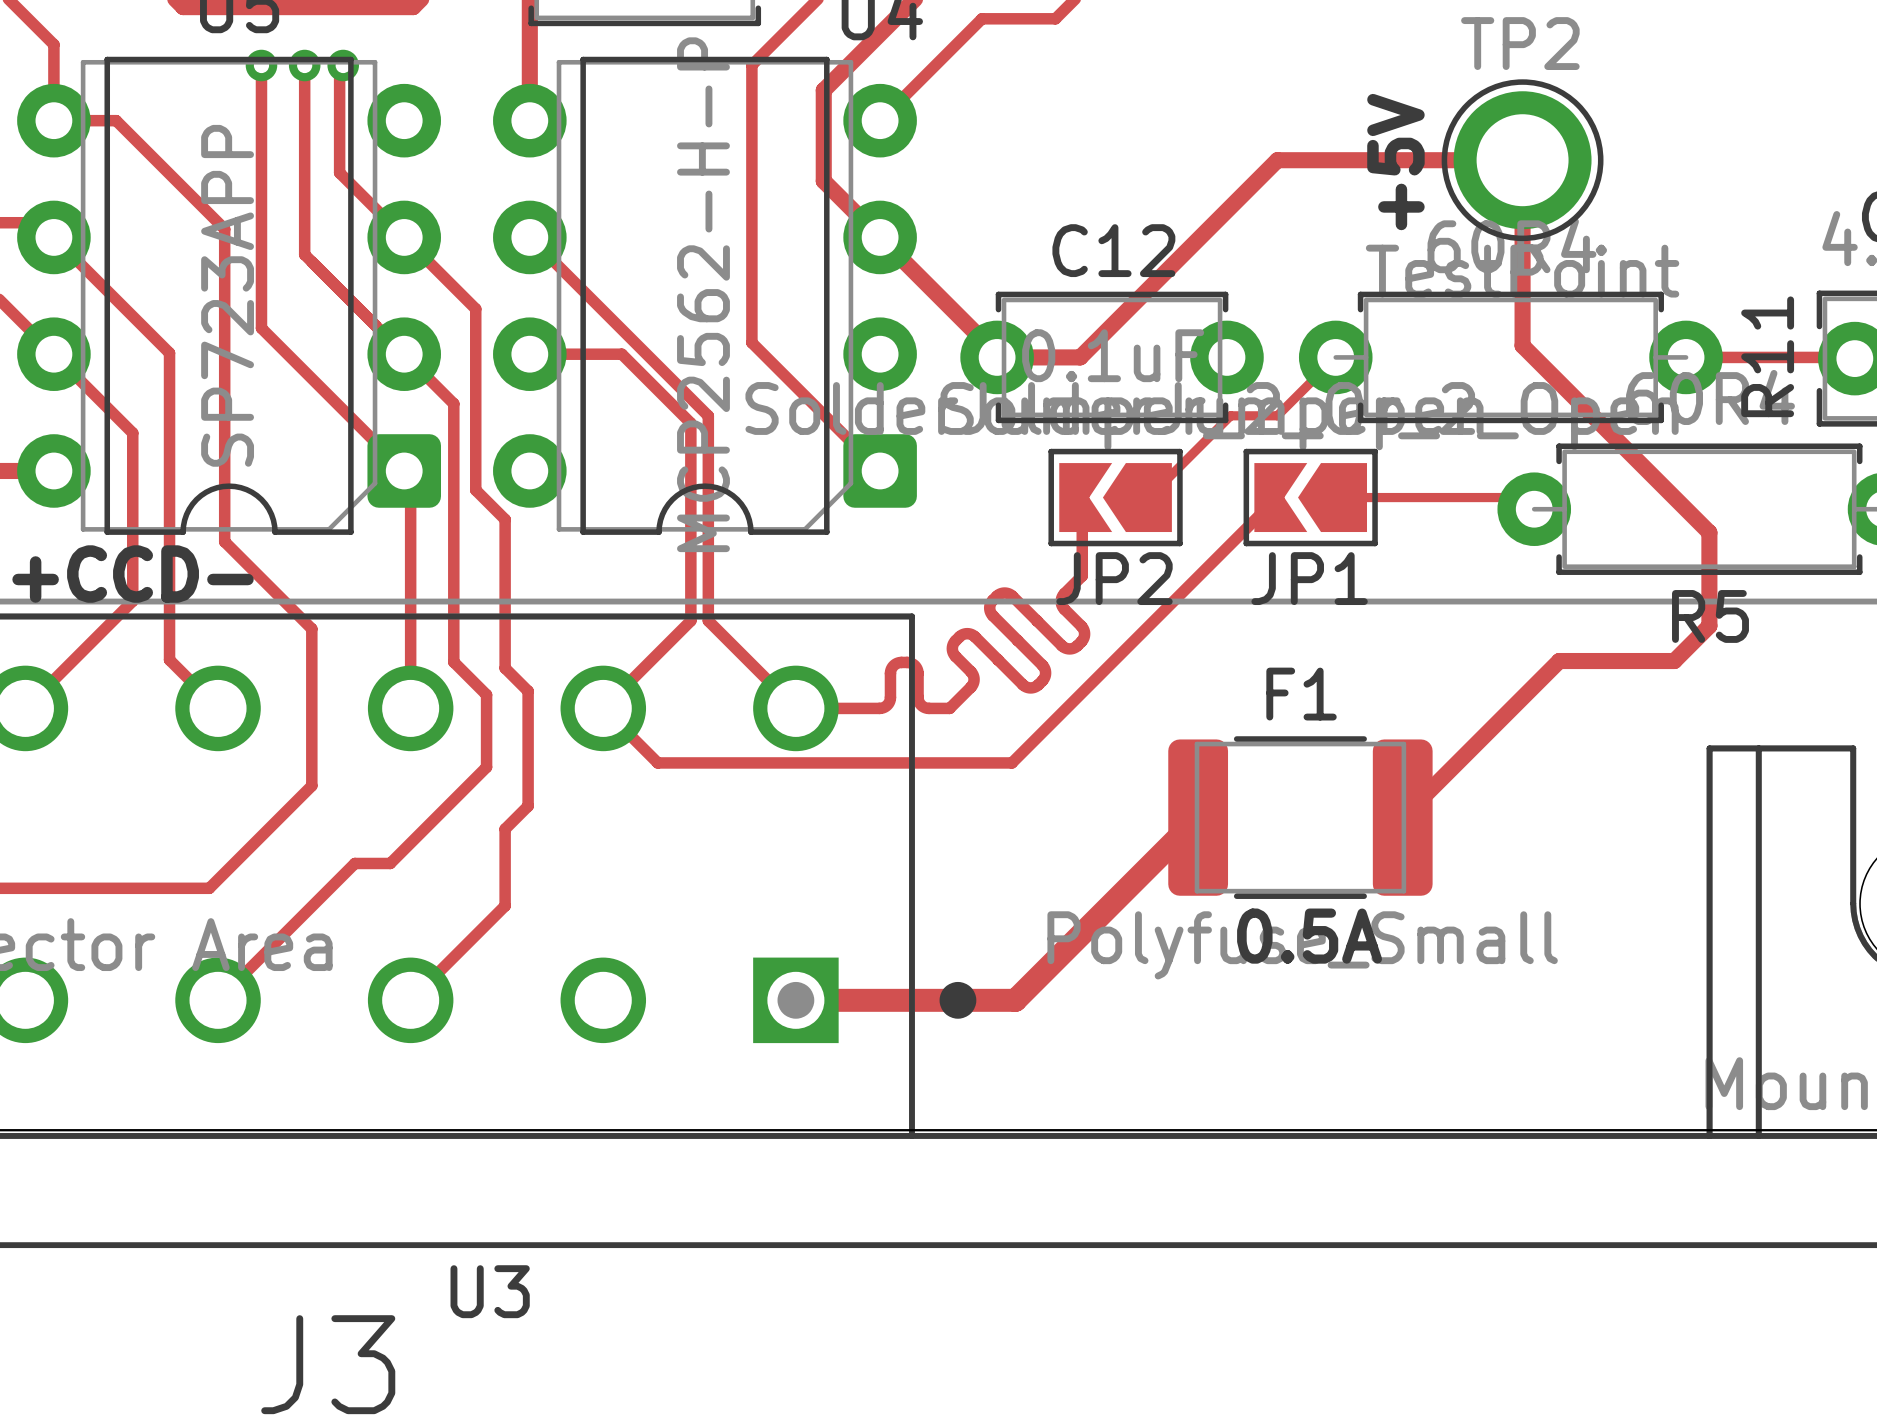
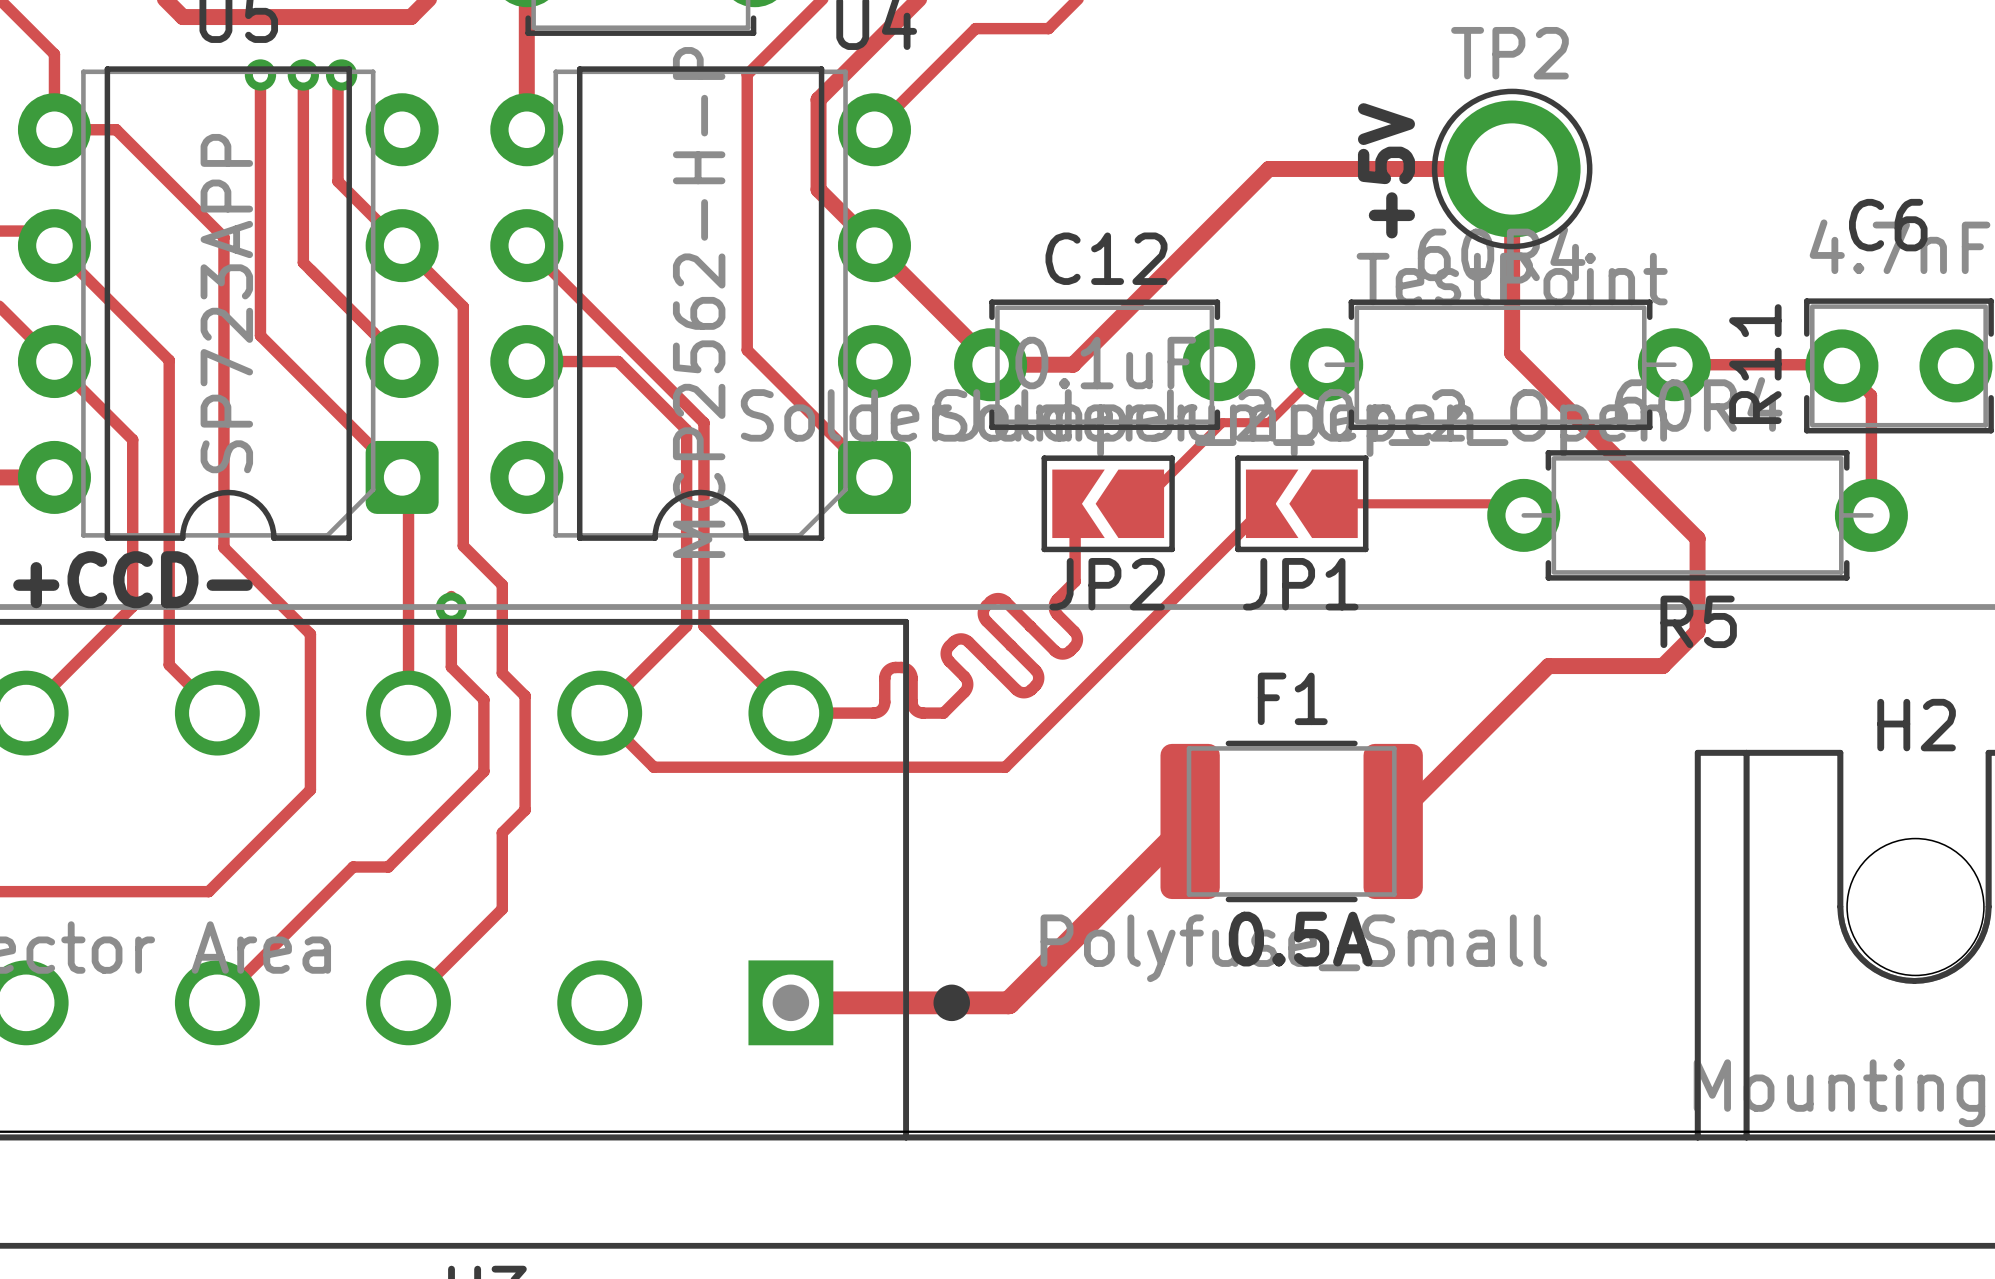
track: (465, 299) (475, 308) (475, 490) (505, 519) (505, 579) -> (463, 306) (463, 545) (502, 584)
track: (404, 354) (453, 403) (453, 590) -> none
via: none -> (451, 608)

